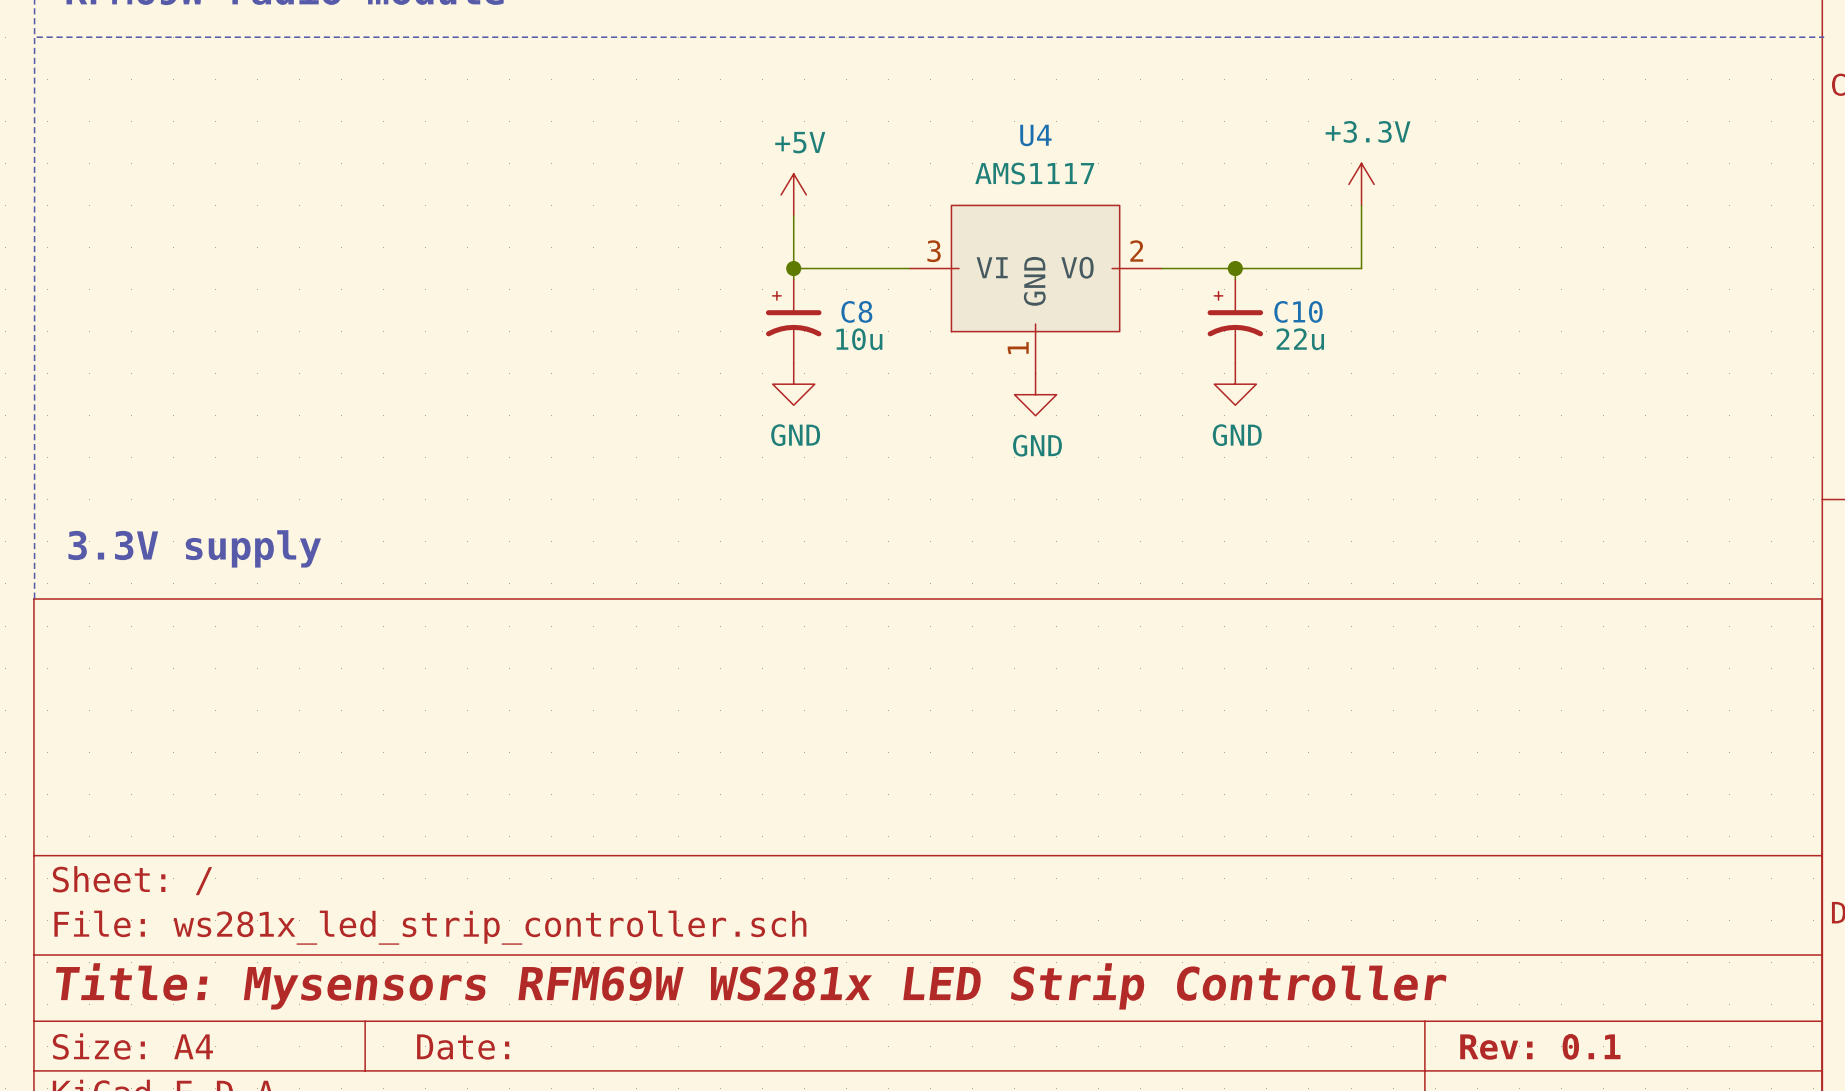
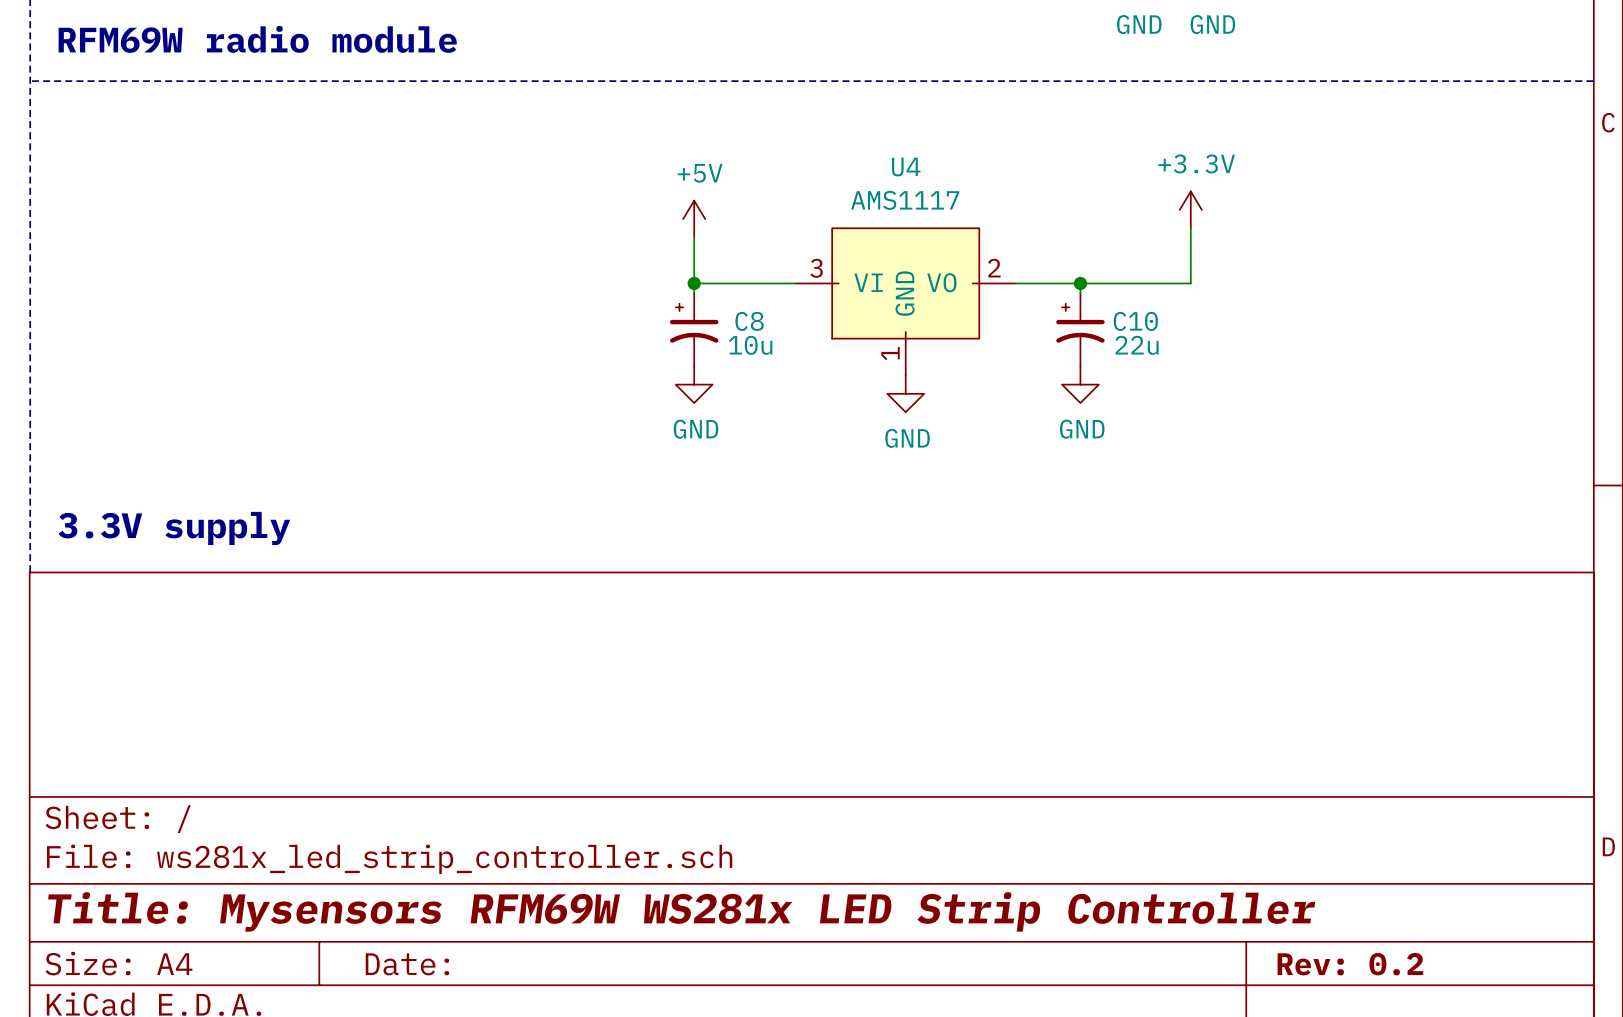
title block: Rev: 0.1 (1540, 1046) -> Rev: 0.2 (1350, 964)

